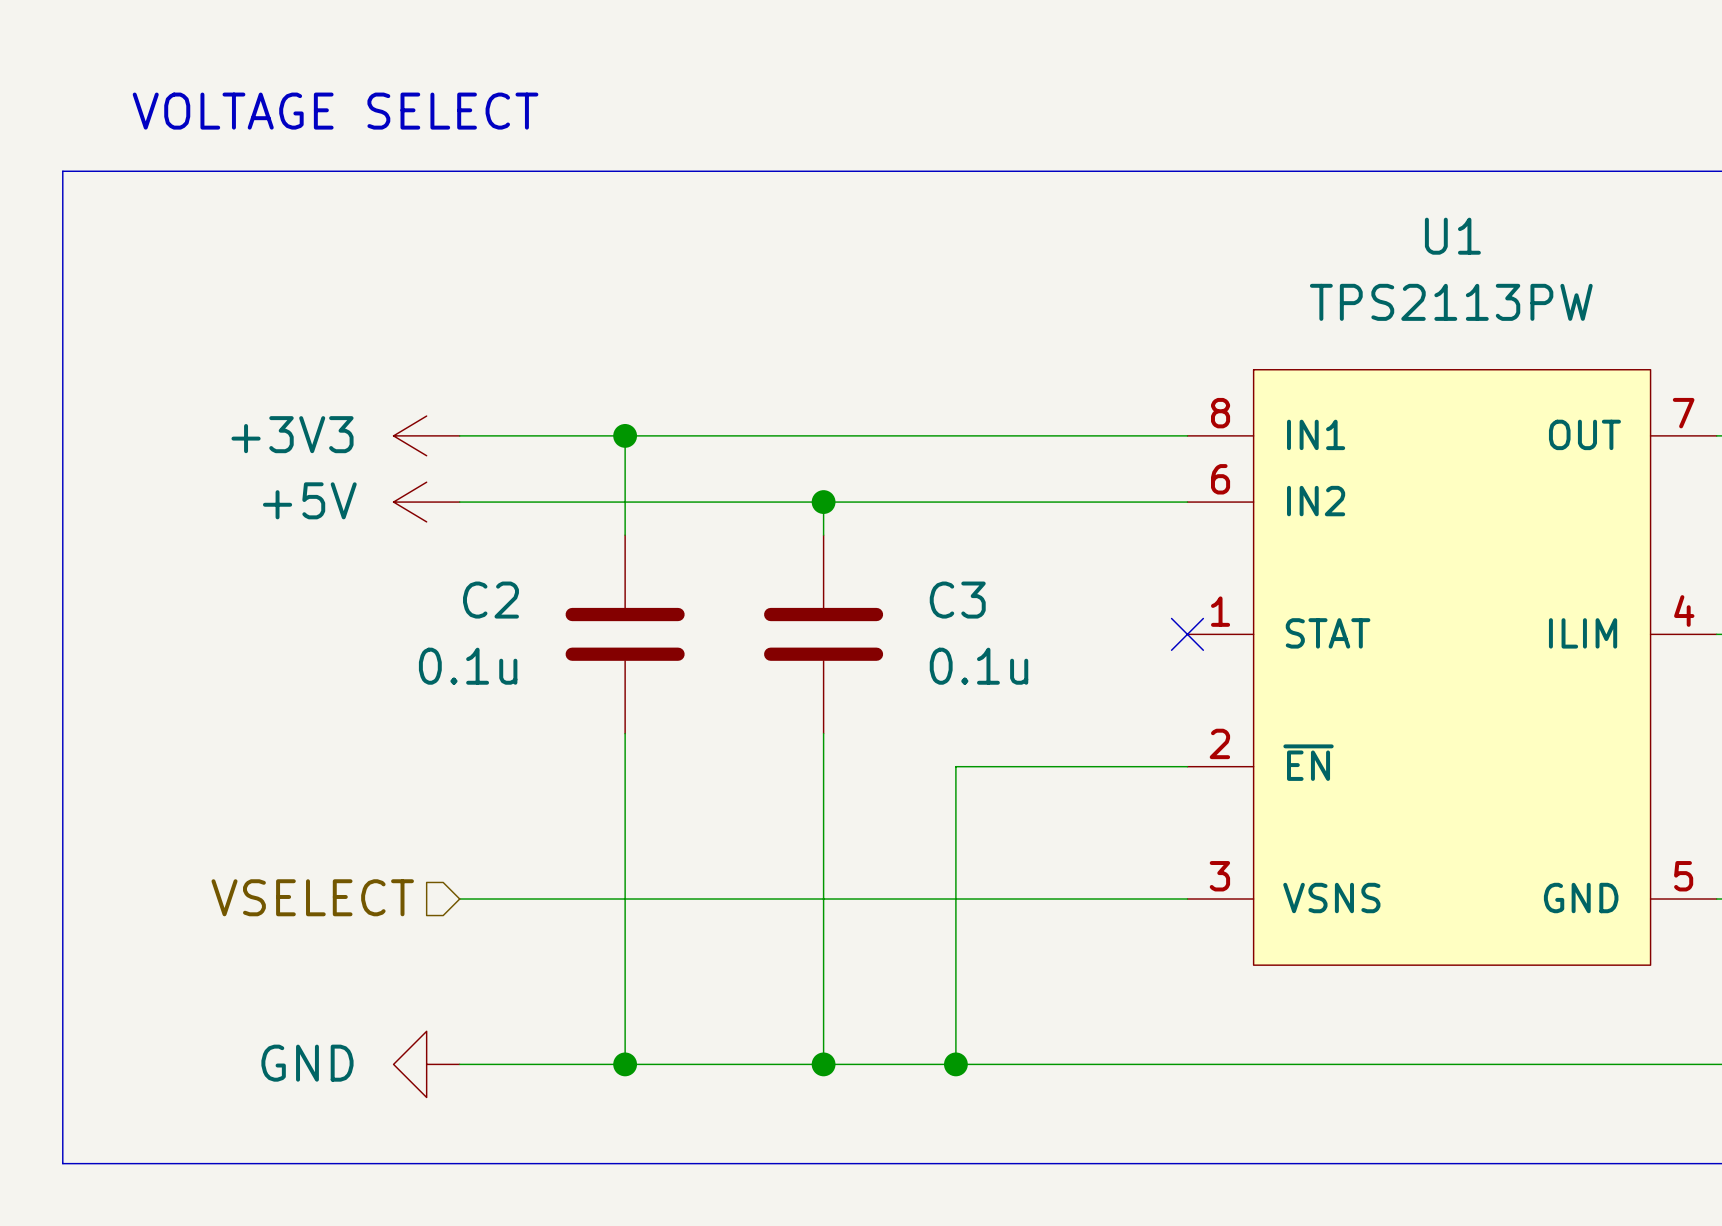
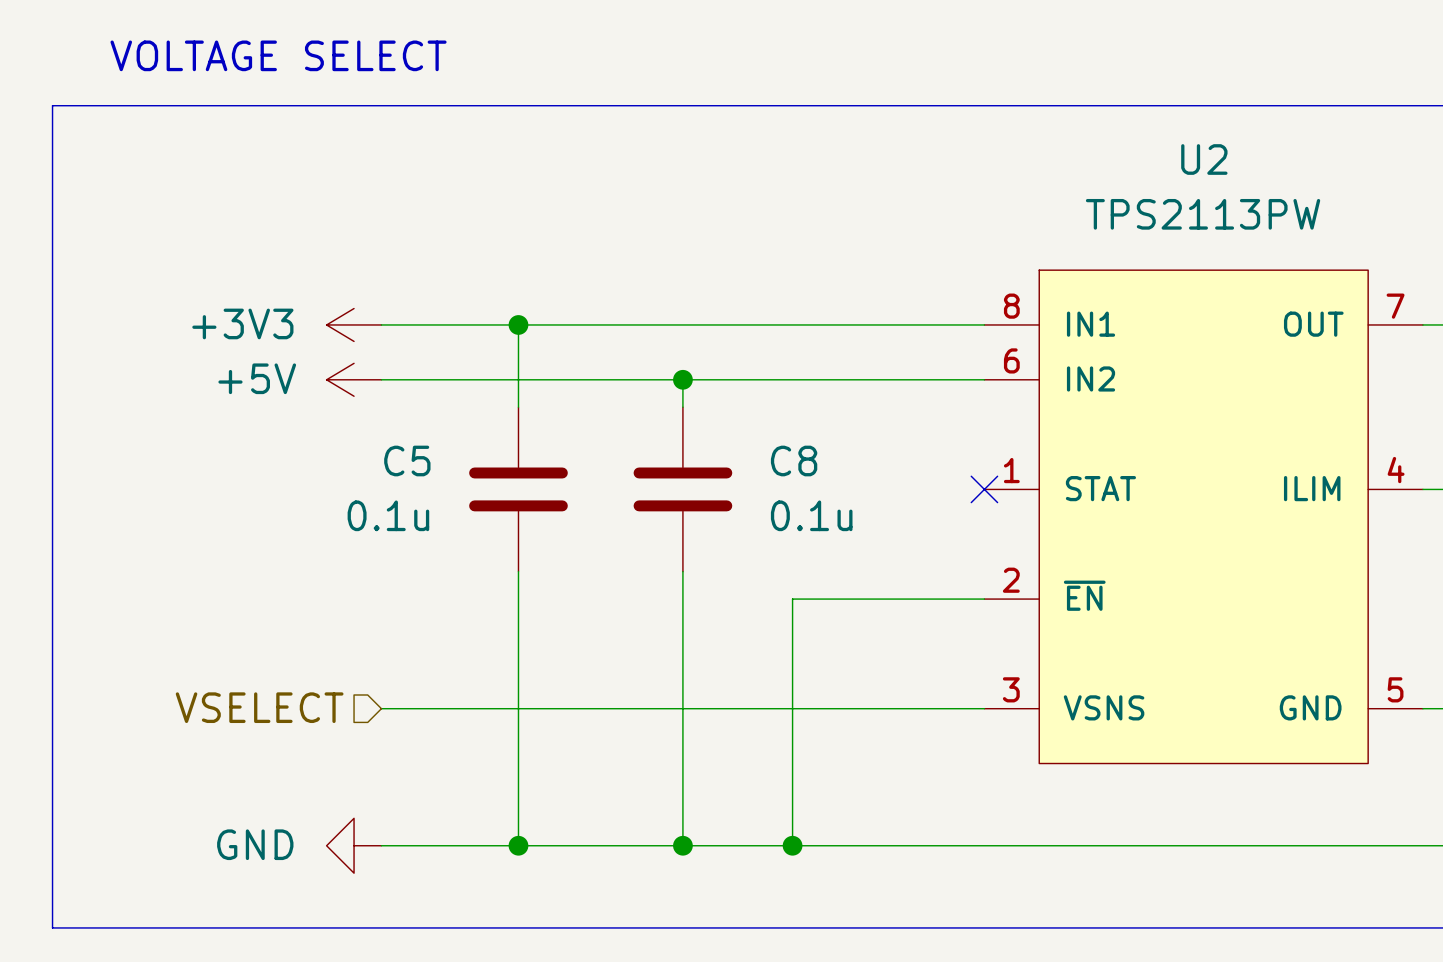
U1 name: U1 (1452, 236) -> U2 (1204, 159)
C2 name: C2 (490, 600) -> C5 (407, 460)
C3 name: C3 (957, 600) -> C8 (794, 460)

